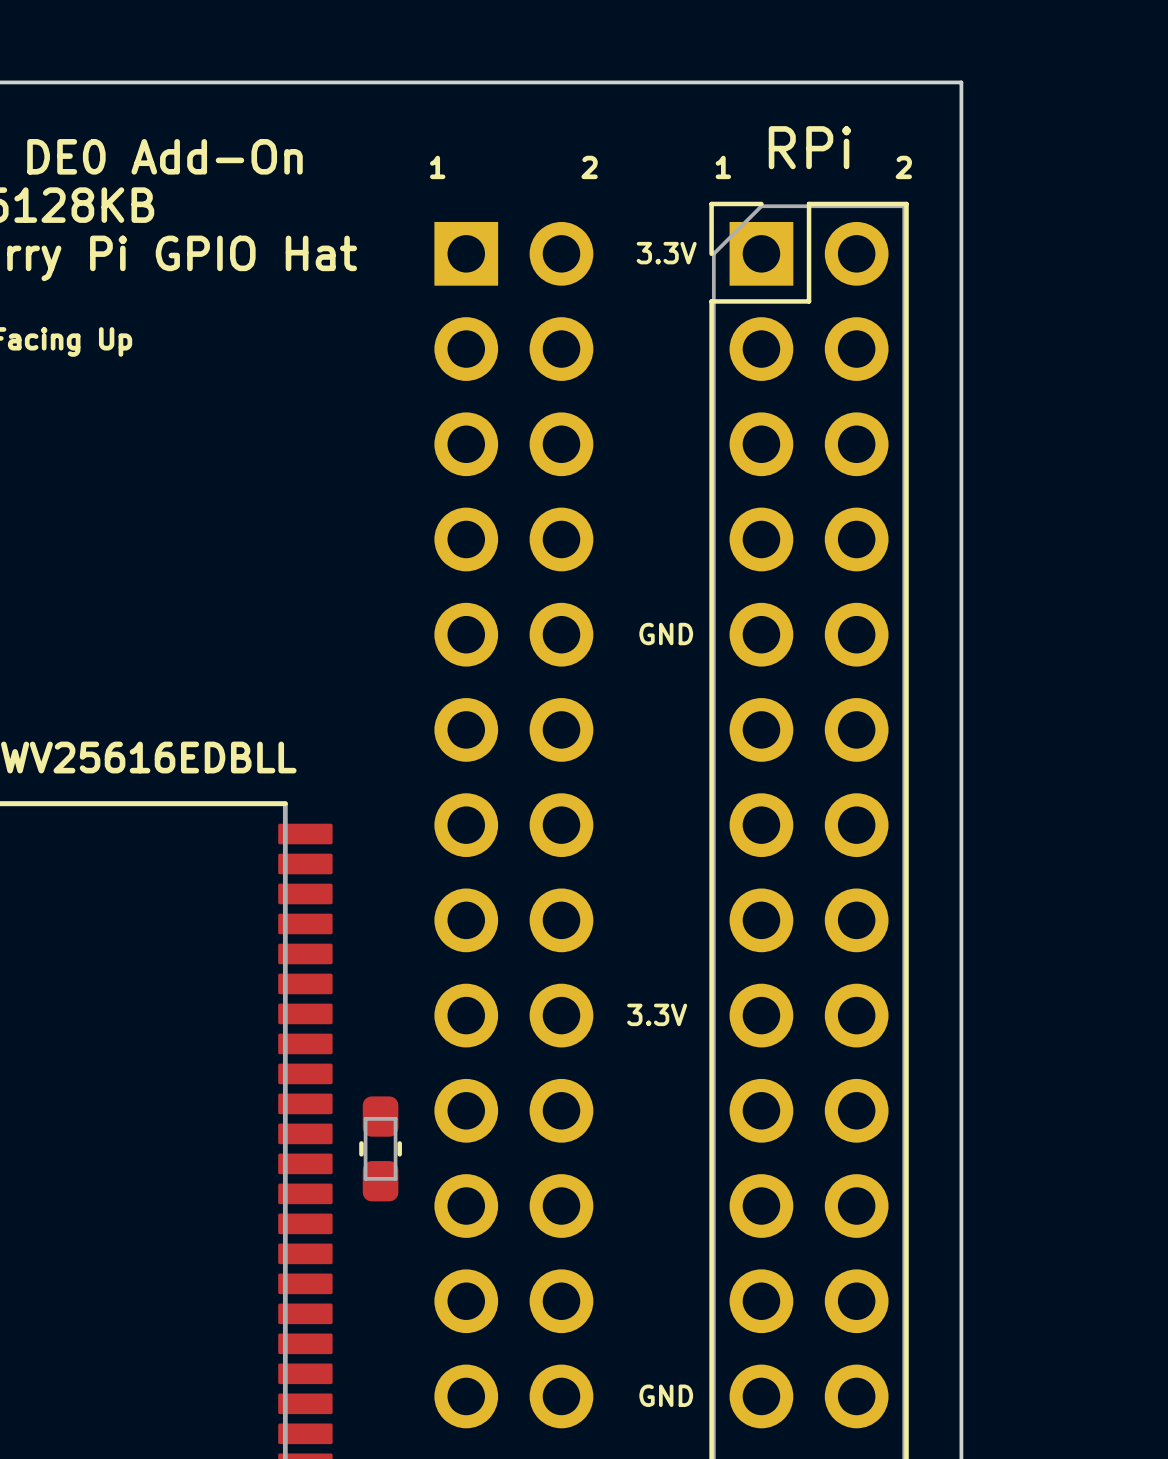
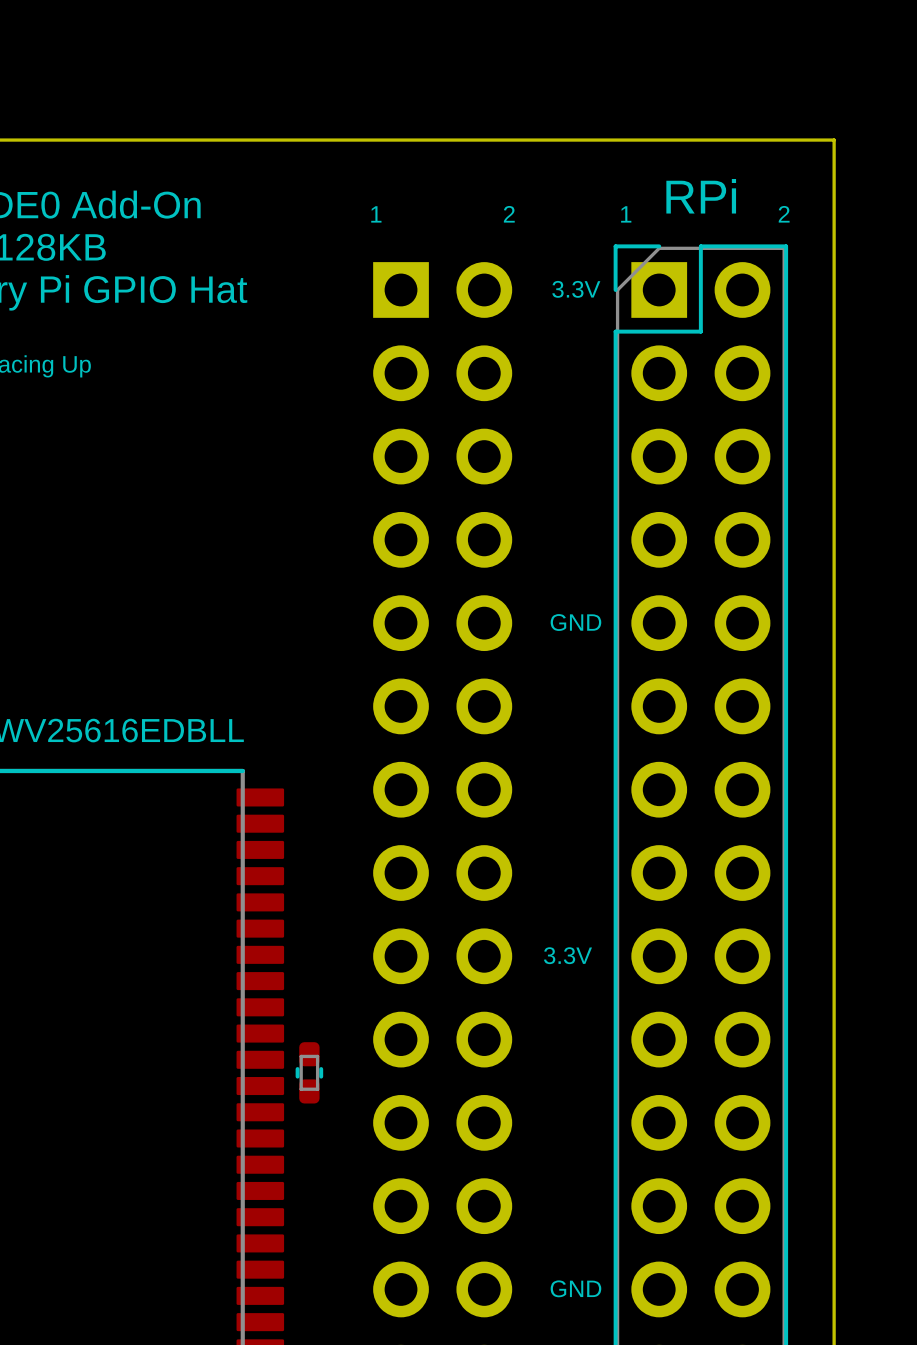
part footprint: [359, 1096, 402, 1202] -> [295, 1042, 324, 1104]

